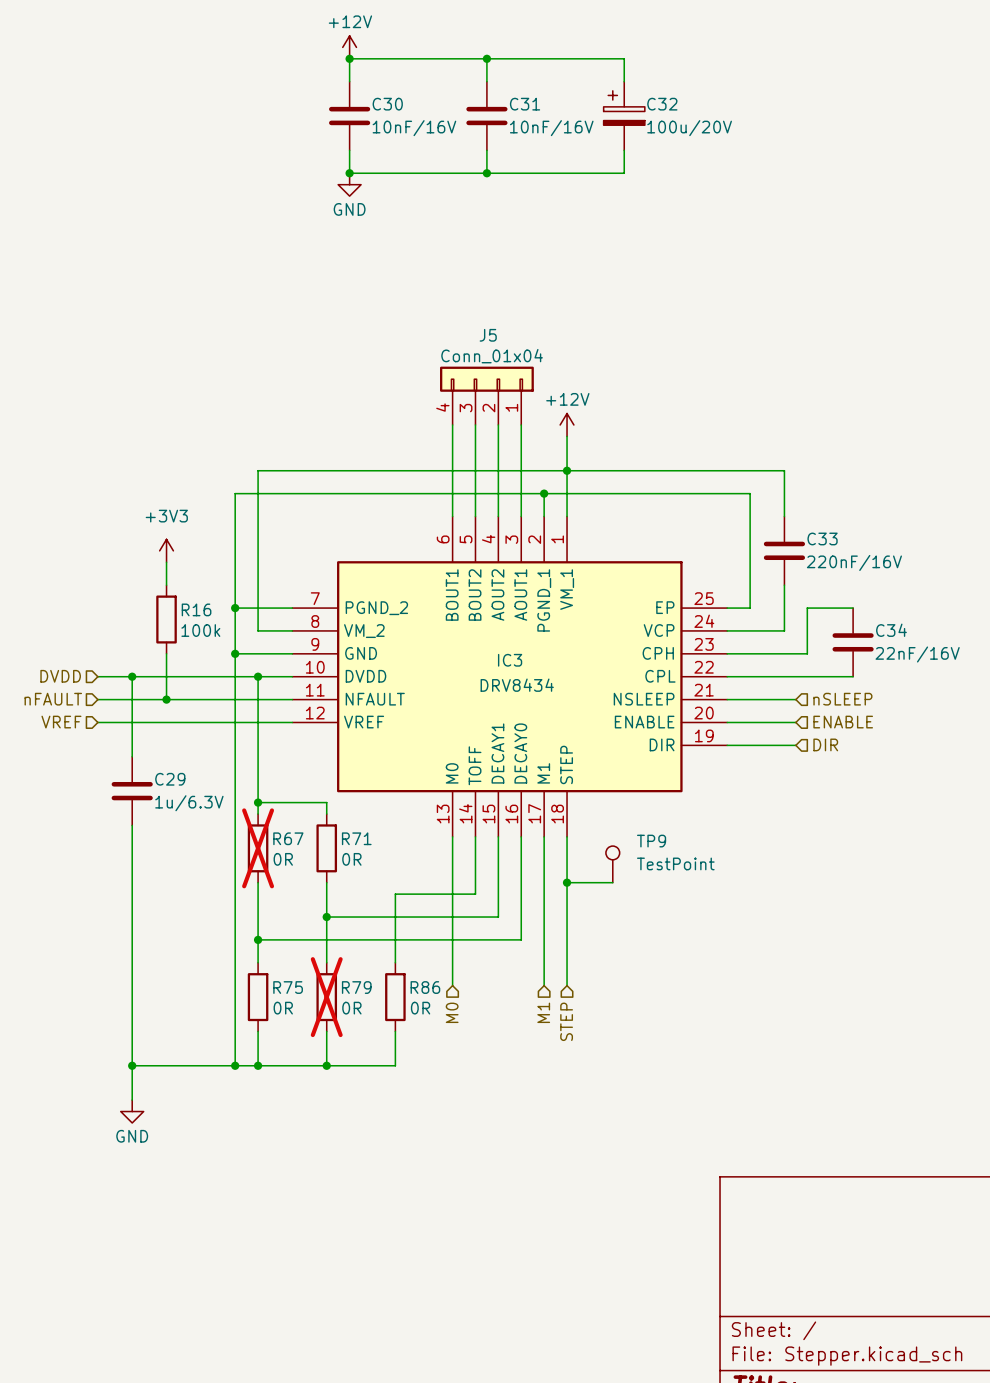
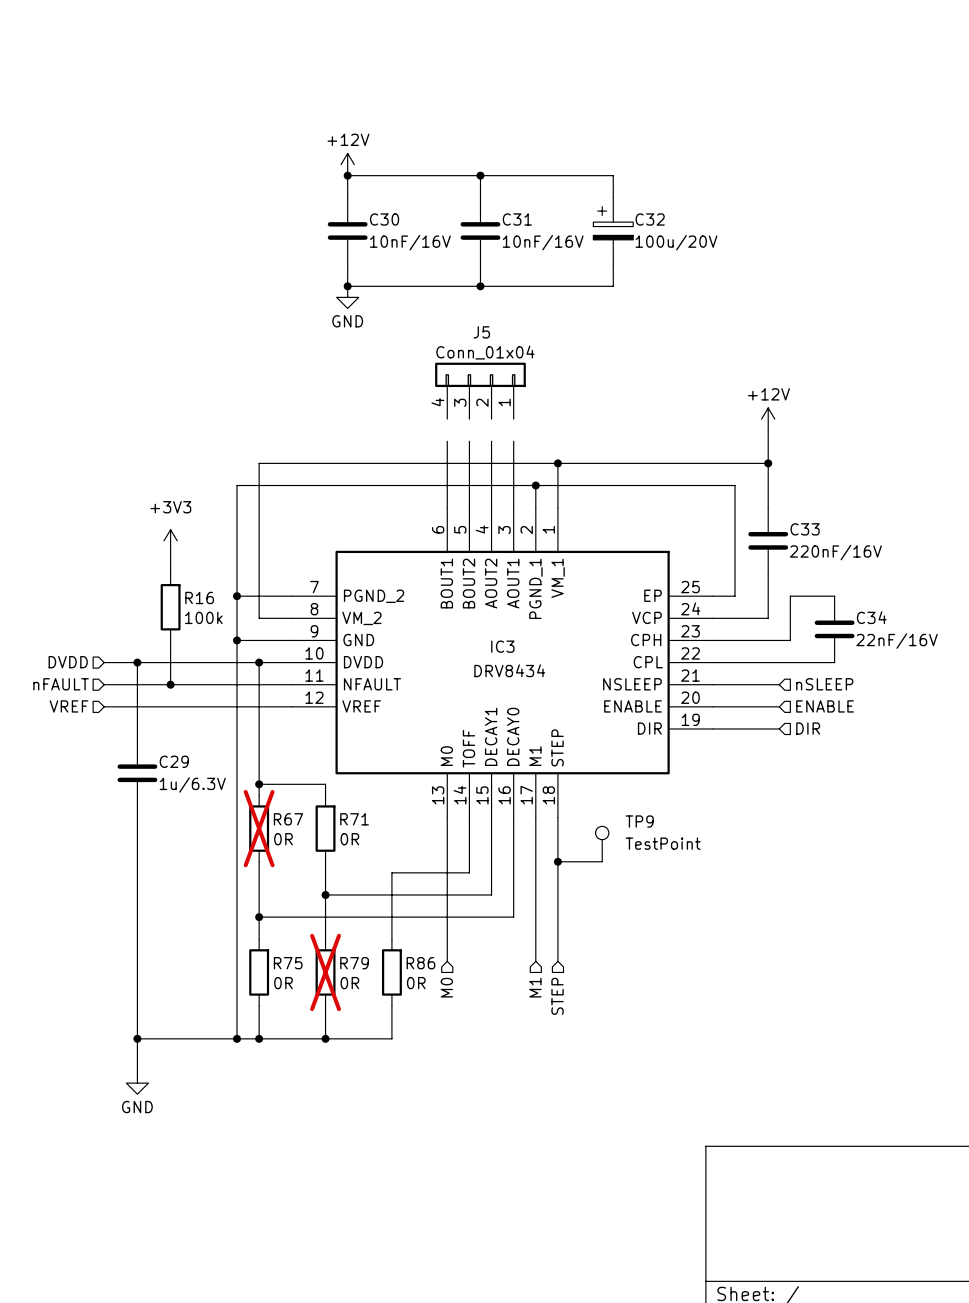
power symbol position: +12V (349, 47) -> +12V (347, 164)
junction: (349, 58) -> none
wire: (486, 58) (486, 81) -> none
junction: (486, 58) -> none
wire: (349, 81) (349, 58) (624, 58) (624, 81) -> none
C30 position: (349, 116) -> (347, 230)
C31 position: (486, 116) -> (480, 230)
C32 position: (624, 116) -> (613, 230)
wire: (486, 150) (486, 173) -> (480, 197) (480, 175)
wire: (624, 150) (624, 173) -> (613, 197) (613, 175)
power symbol position: GND (349, 184) -> GND (347, 297)
wire: none -> (347, 264) (347, 286) (613, 286) (613, 264)
junction: none -> (347, 286)
junction: none -> (480, 286)
wire: (452, 424) (452, 447) -> none
wire: (475, 424) (475, 447) -> (480, 264) (480, 286)
wire: (498, 424) (498, 447) -> none
wire: (521, 424) (521, 447) -> none
power symbol: +12V (567, 424) -> none
power symbol: none -> +12V (768, 419)
wire: (567, 436) (567, 470) -> (768, 430) (768, 463)
junction: none -> (768, 463)

